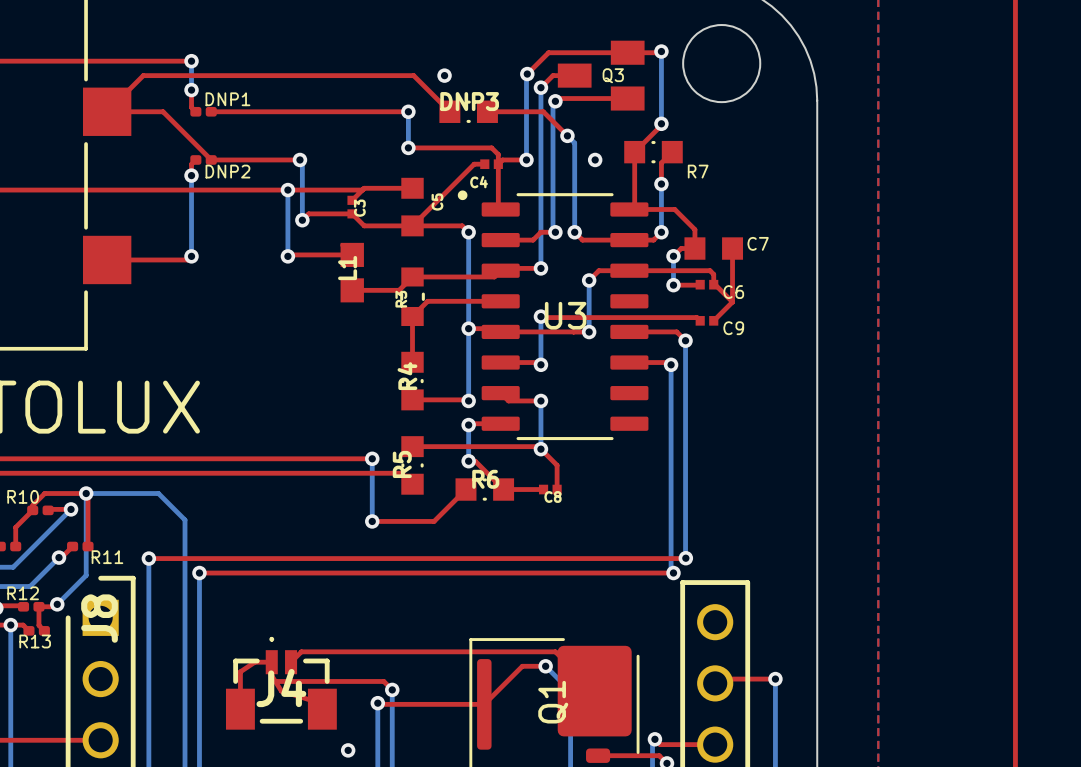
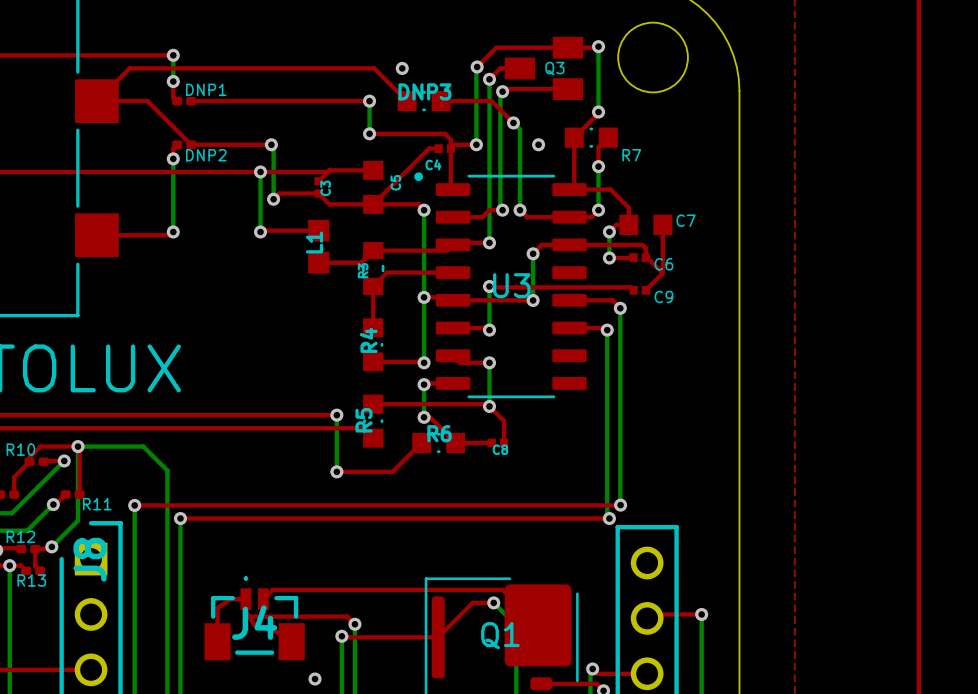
Q1 name rotation: 0° (553, 702) -> 90° clockwise (500, 635)

